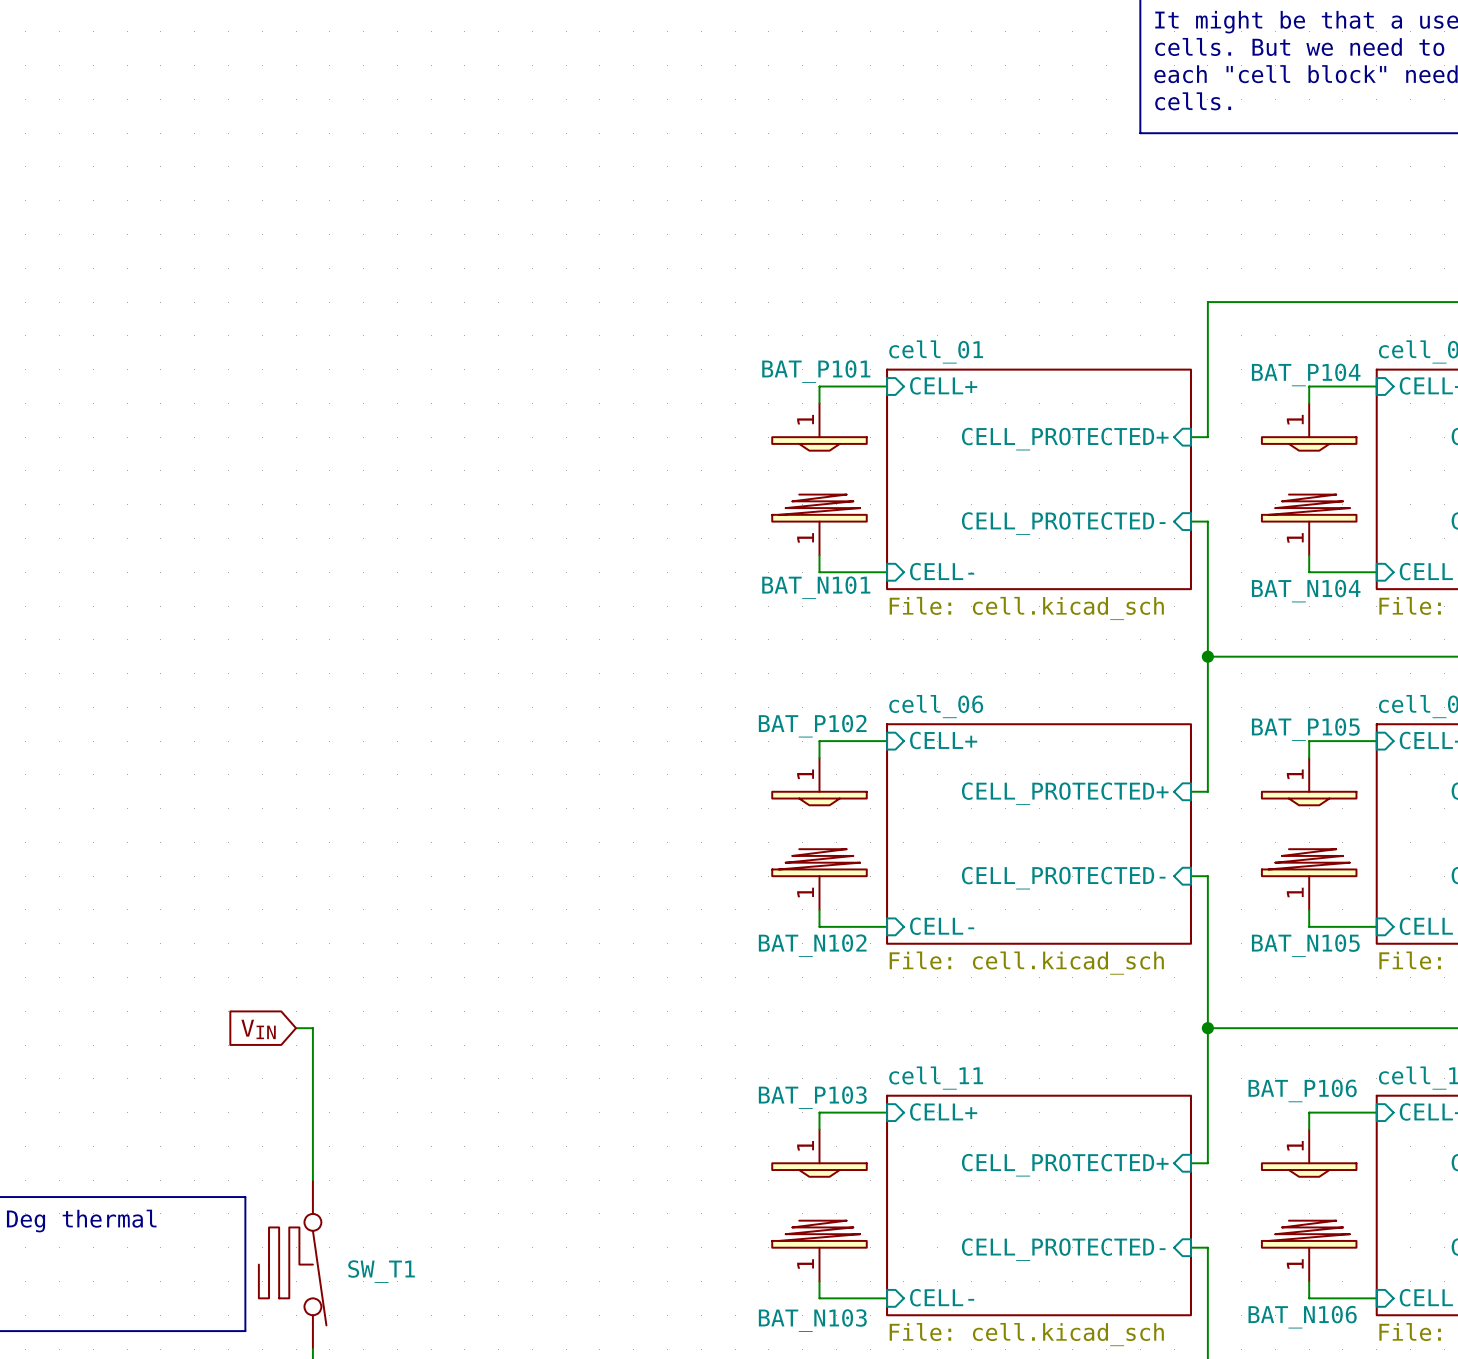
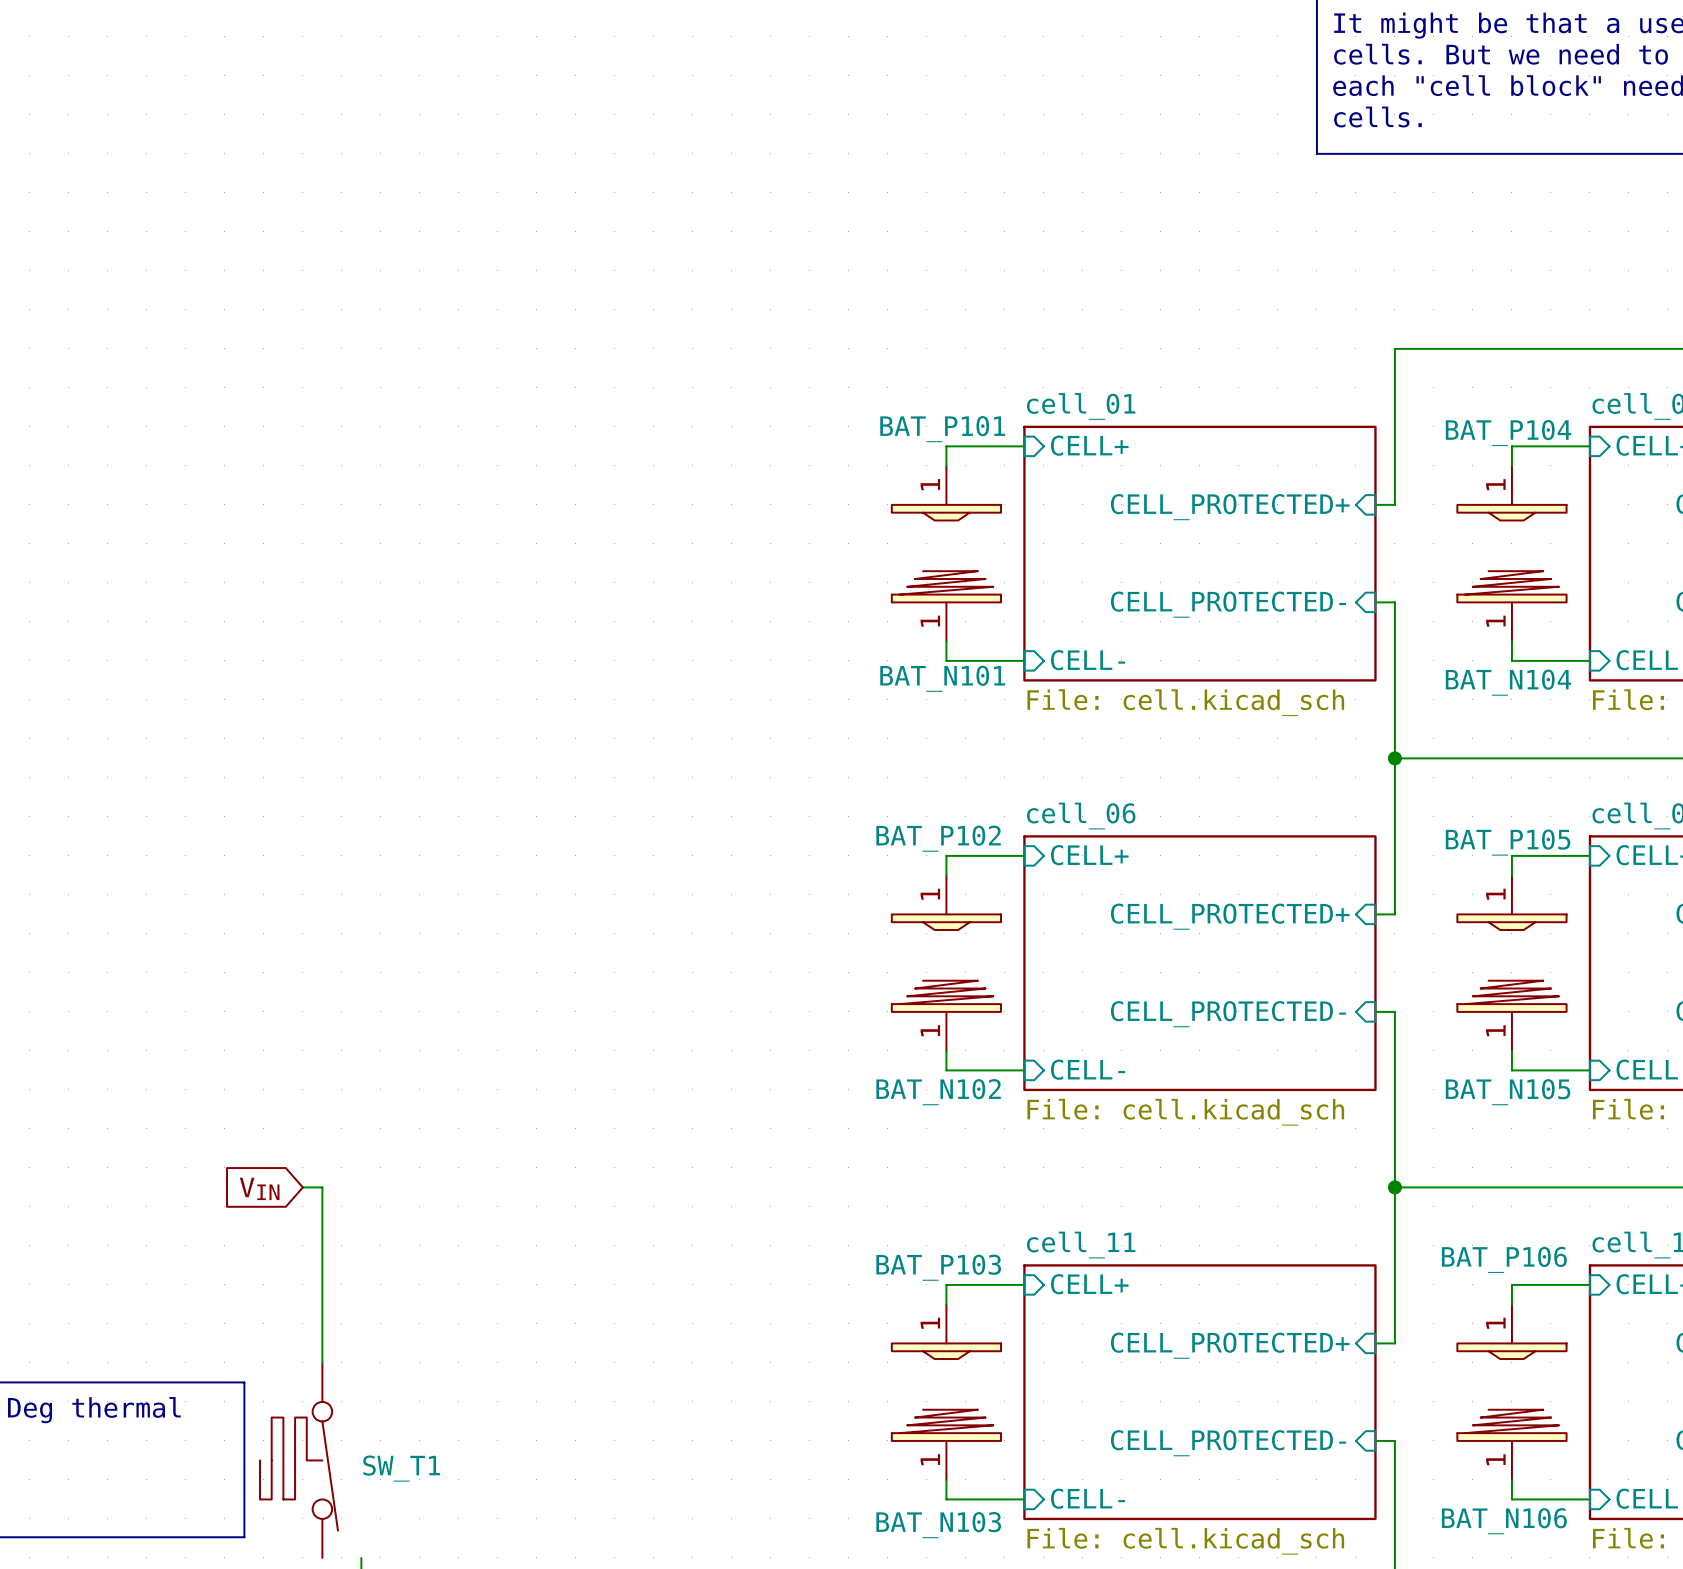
wire: (296, 1028) (312, 1028) (312, 1180) -> (302, 1187) (322, 1187) (322, 1362)
global label position: VIN (258, 1029) -> VIN (259, 1188)
line: (211, 1197) (245, 1197) (245, 1331) (211, 1331) -> (244, 1382) (244, 1537)
SW_T1 position: (292, 1264) -> (298, 1460)

